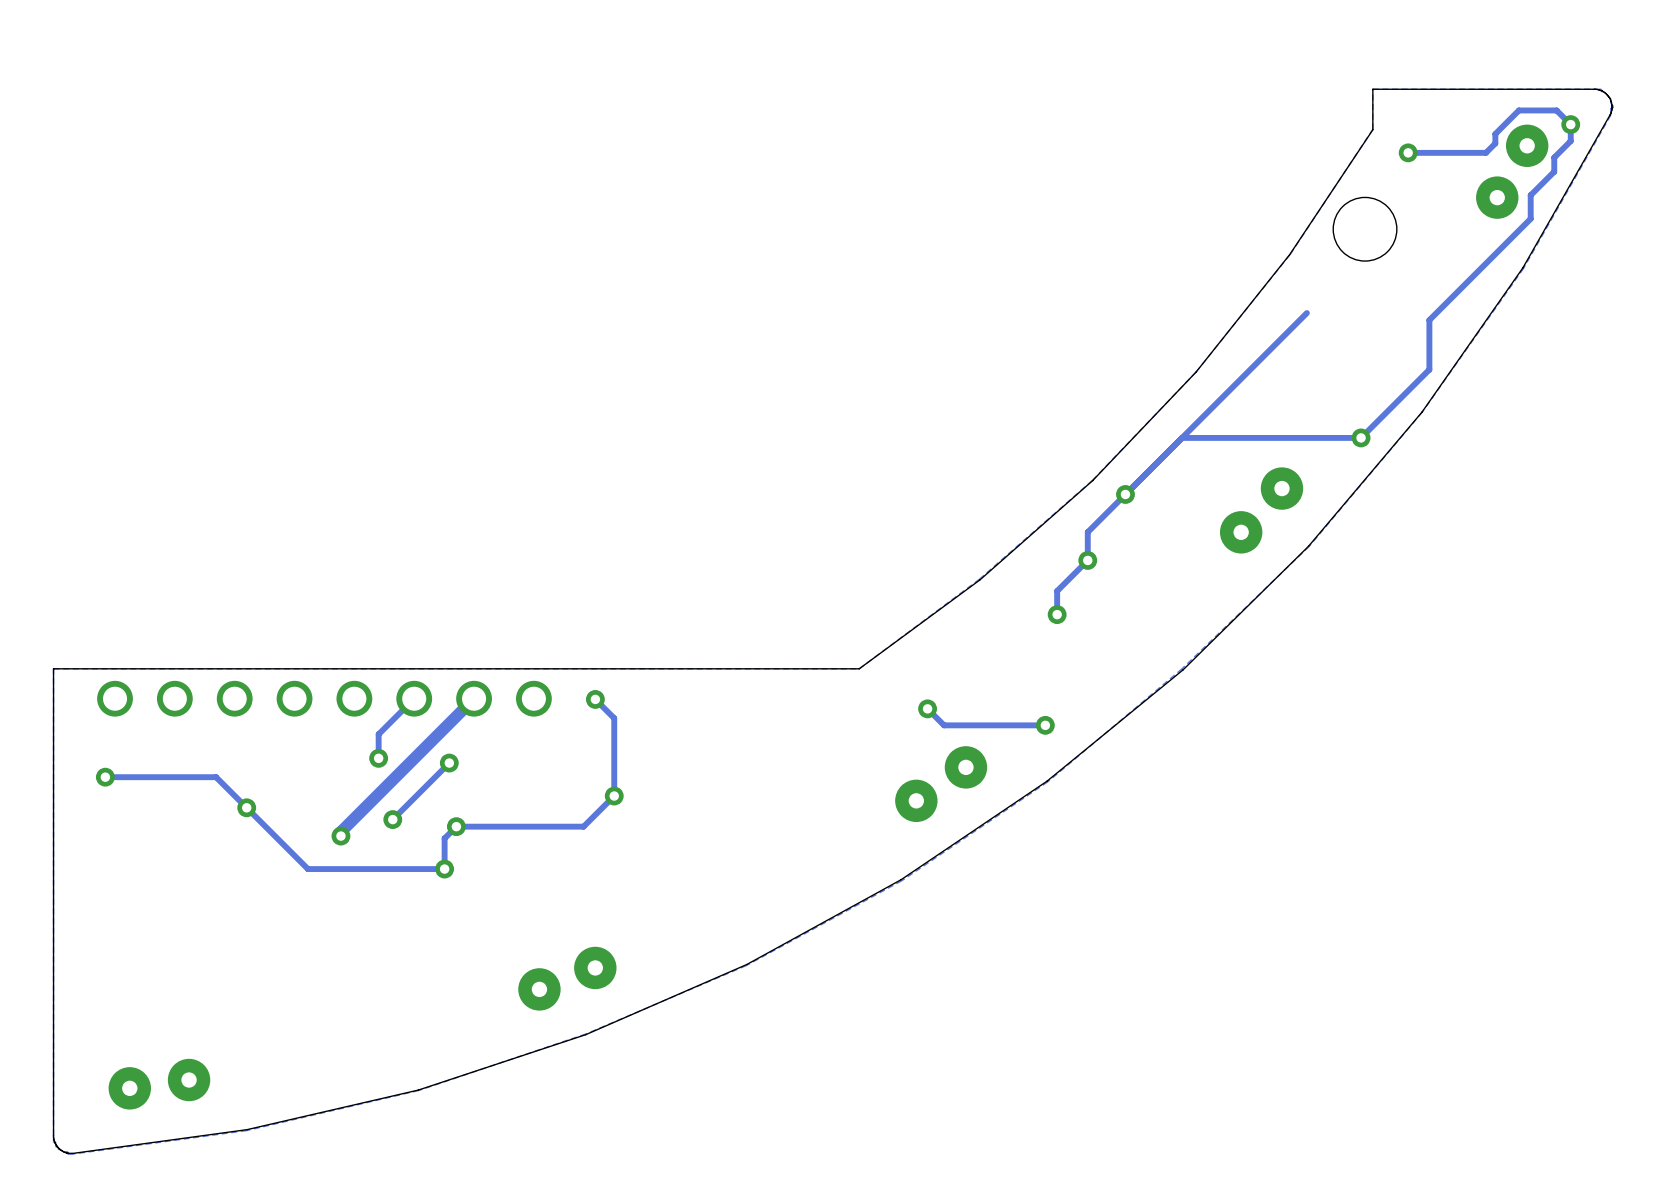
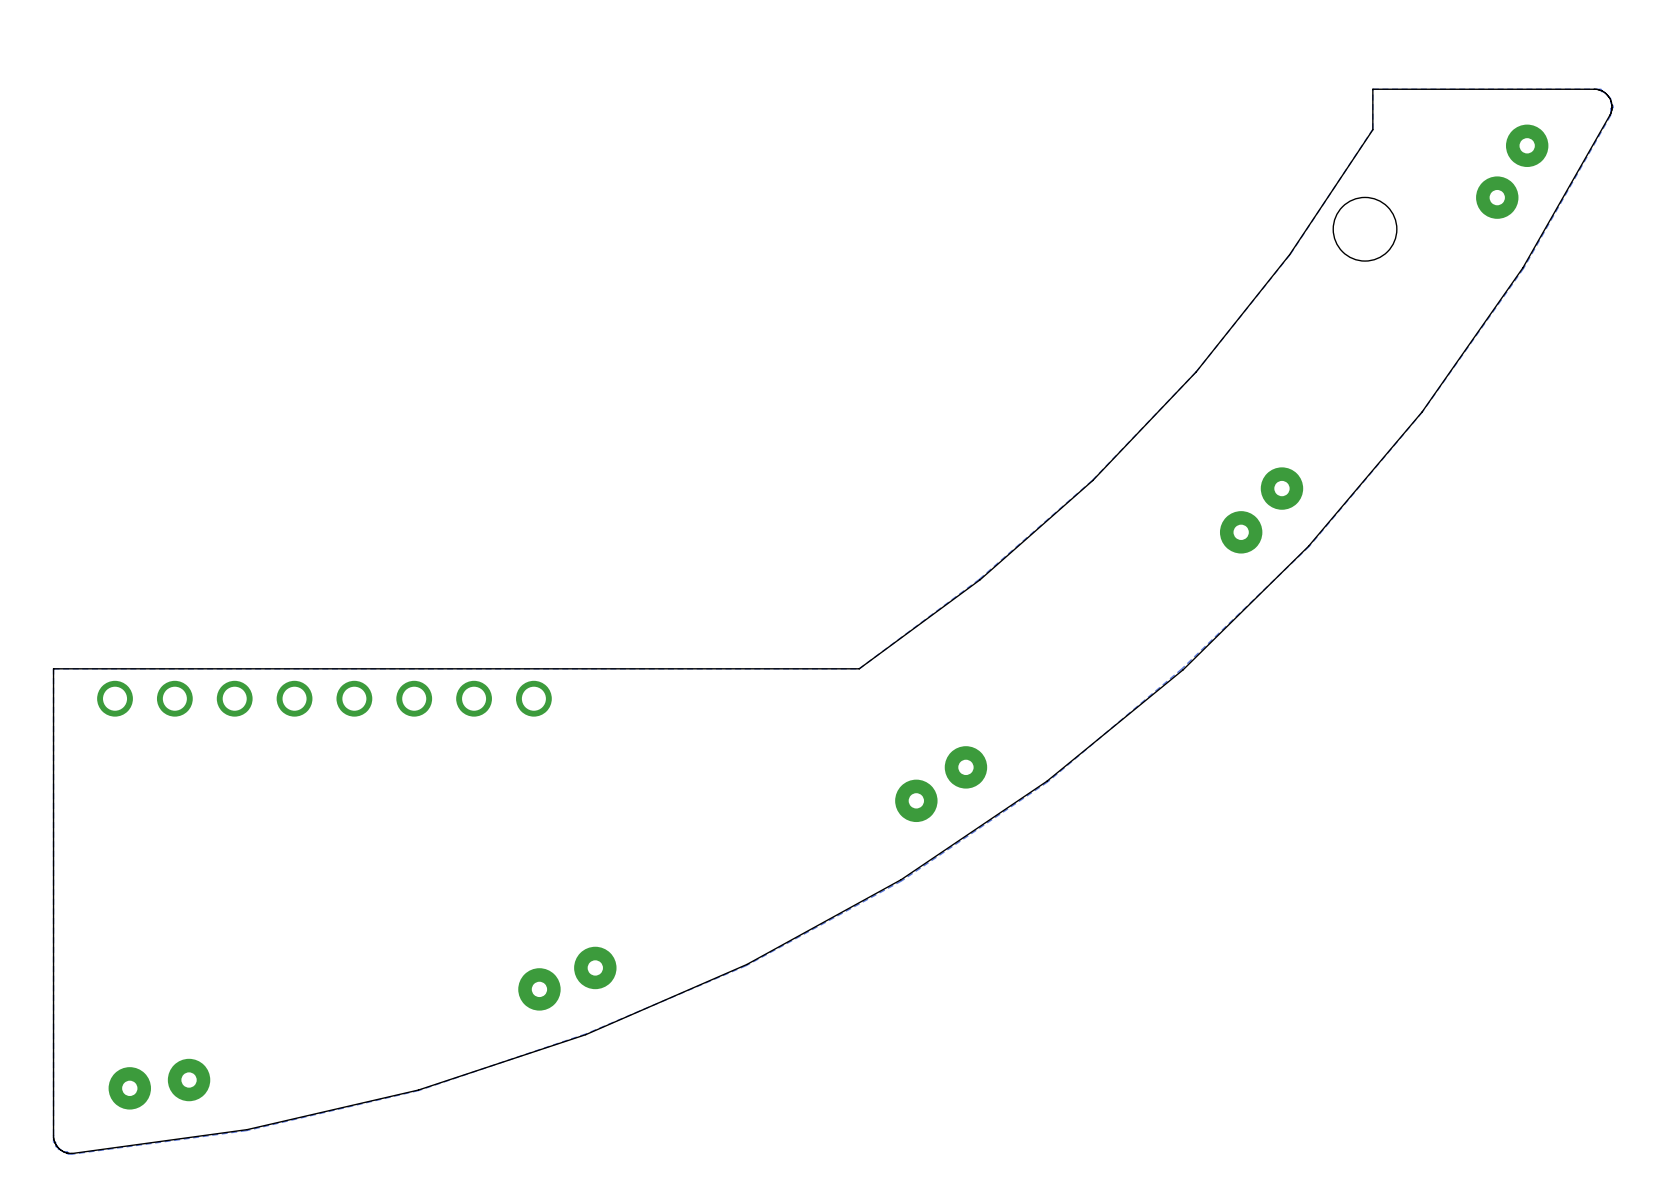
via: (1570, 124) -> none
track: (1408, 152) (1485, 152) (1495, 143) (1495, 134) (1518, 110) (1556, 110) (1570, 124) (1570, 141) (1554, 157) (1554, 171) (1530, 195) (1530, 218) (1429, 320) (1429, 369) (1361, 437) (1182, 437) -> none
via: (1408, 152) -> none
track: (1306, 313) (1087, 532) (1087, 560) (1057, 591) (1057, 614) -> none
via: (1361, 437) -> none
via: (1125, 494) -> none
via: (1087, 560) -> none
via: (1057, 614) -> none
track: (414, 698) (378, 734) (378, 758) -> none
track: (474, 698) (340, 831) (340, 836) -> none
track: (595, 699) (614, 718) (614, 796) (583, 826) (456, 826) (444, 838) (444, 869) (307, 869) (216, 777) (105, 777) -> none
via: (595, 699) -> none
track: (927, 708) (944, 725) (1045, 725) -> none
via: (927, 708) -> none
via: (1045, 725) -> none
via: (378, 758) -> none
track: (449, 763) (392, 819) -> none
via: (449, 763) -> none
via: (105, 777) -> none
via: (614, 796) -> none
via: (246, 807) -> none
via: (392, 819) -> none
via: (456, 826) -> none
via: (340, 836) -> none
via: (444, 869) -> none

